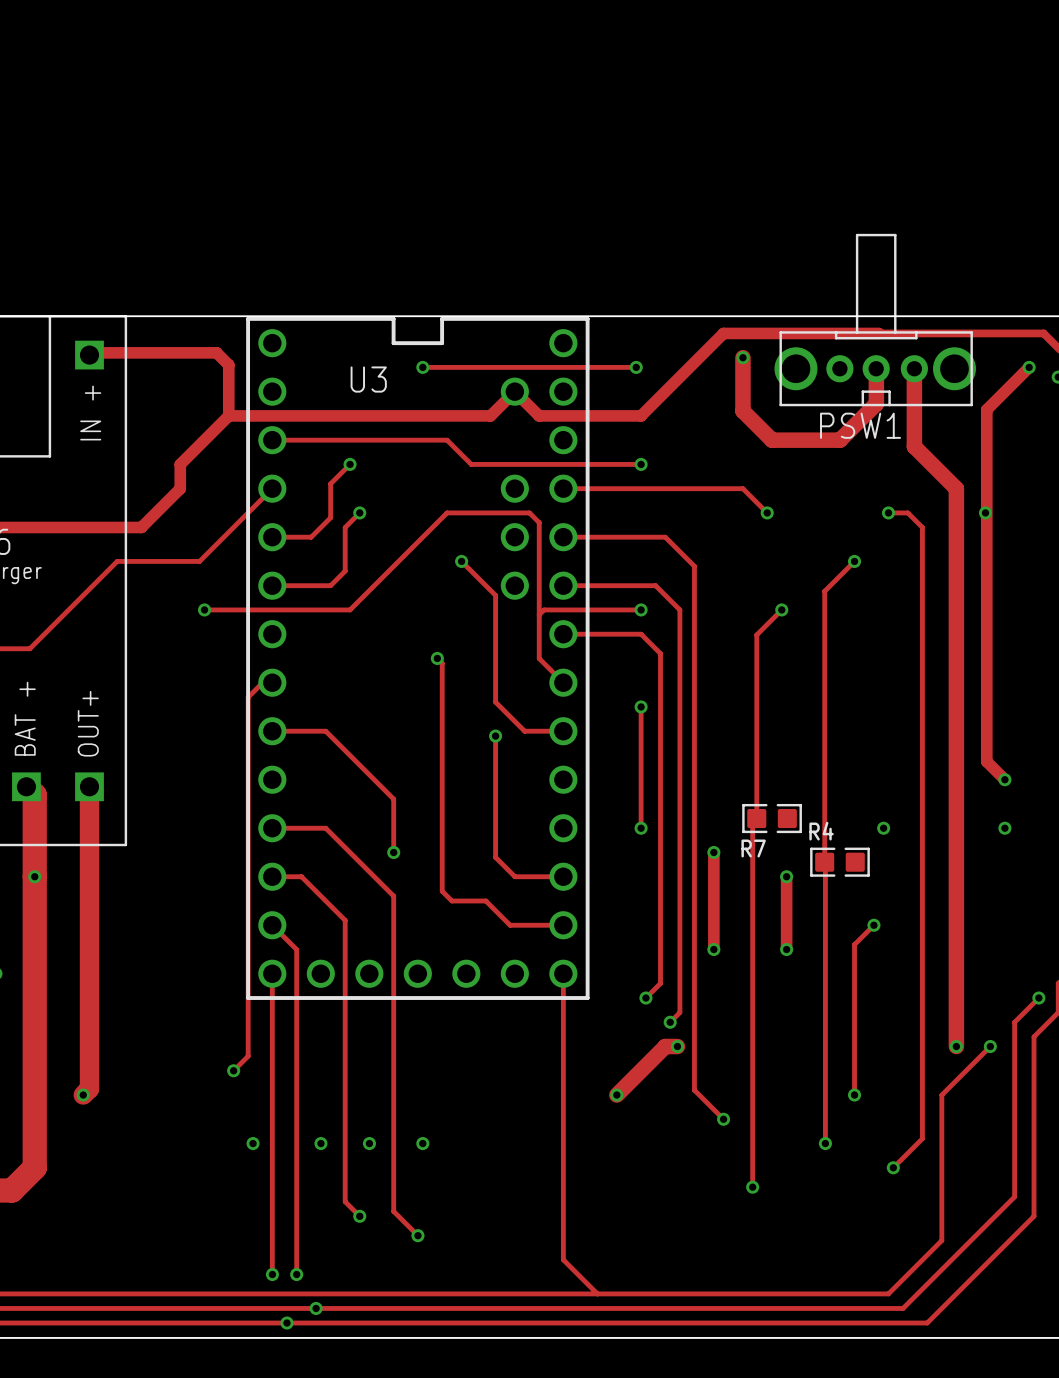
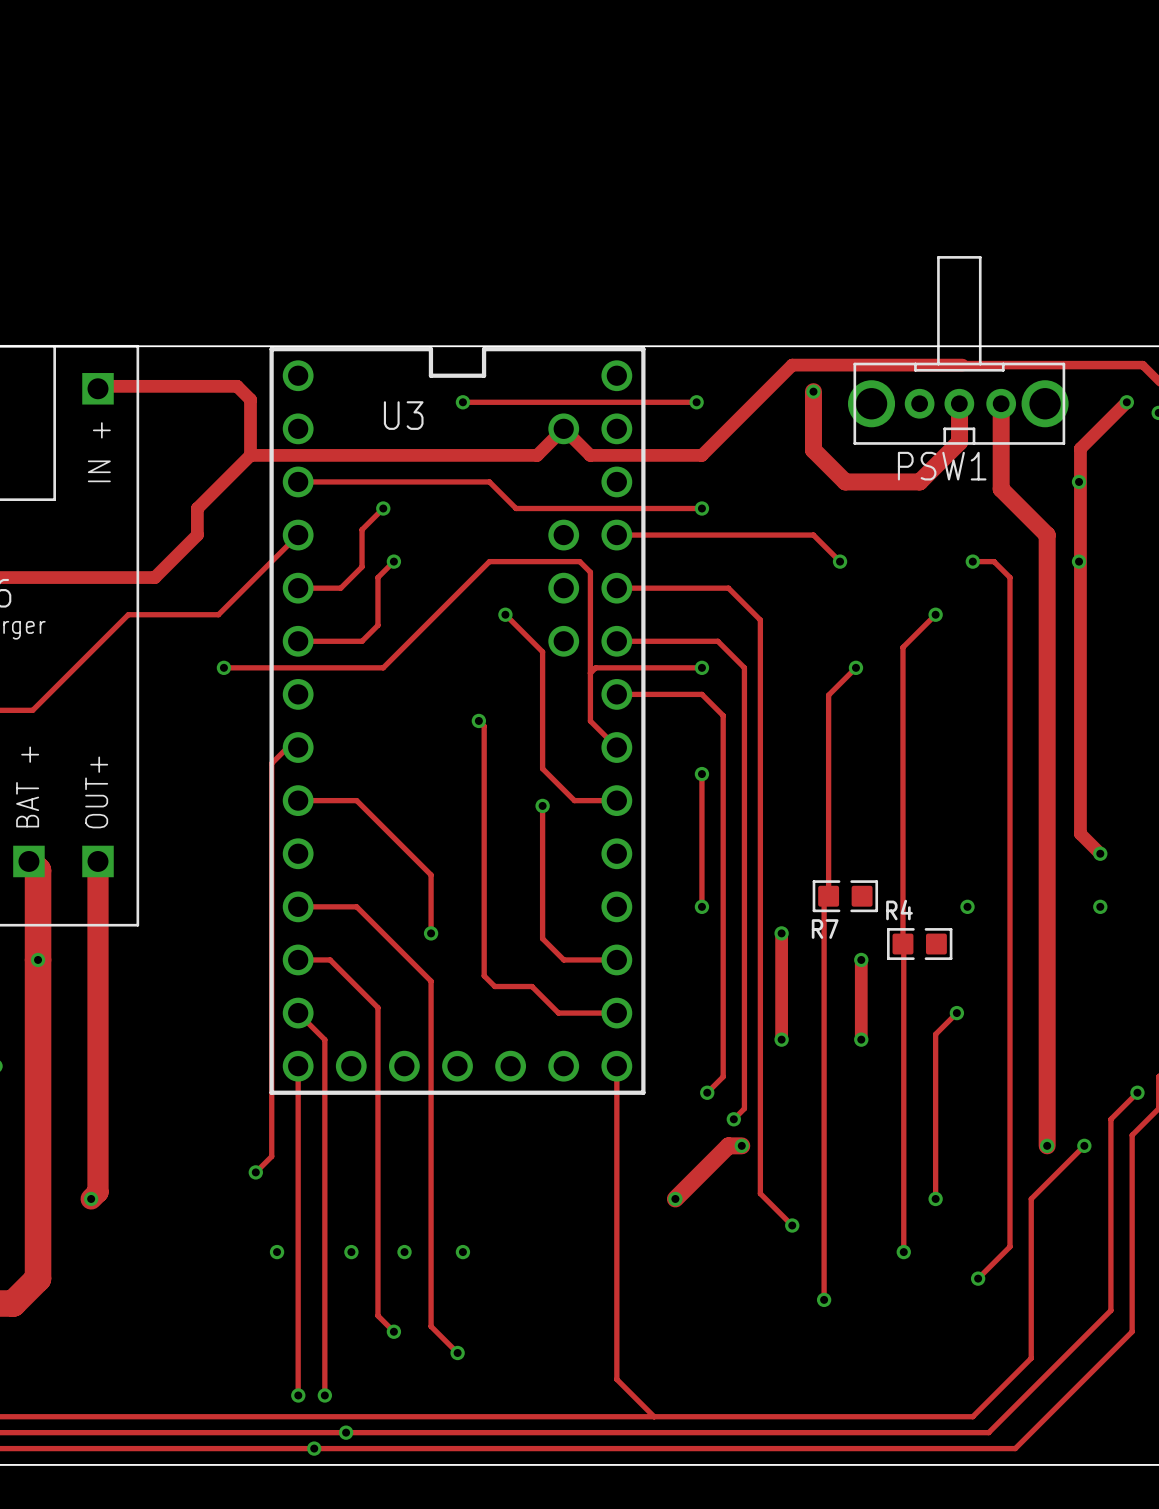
via: none -> (1079, 481)

